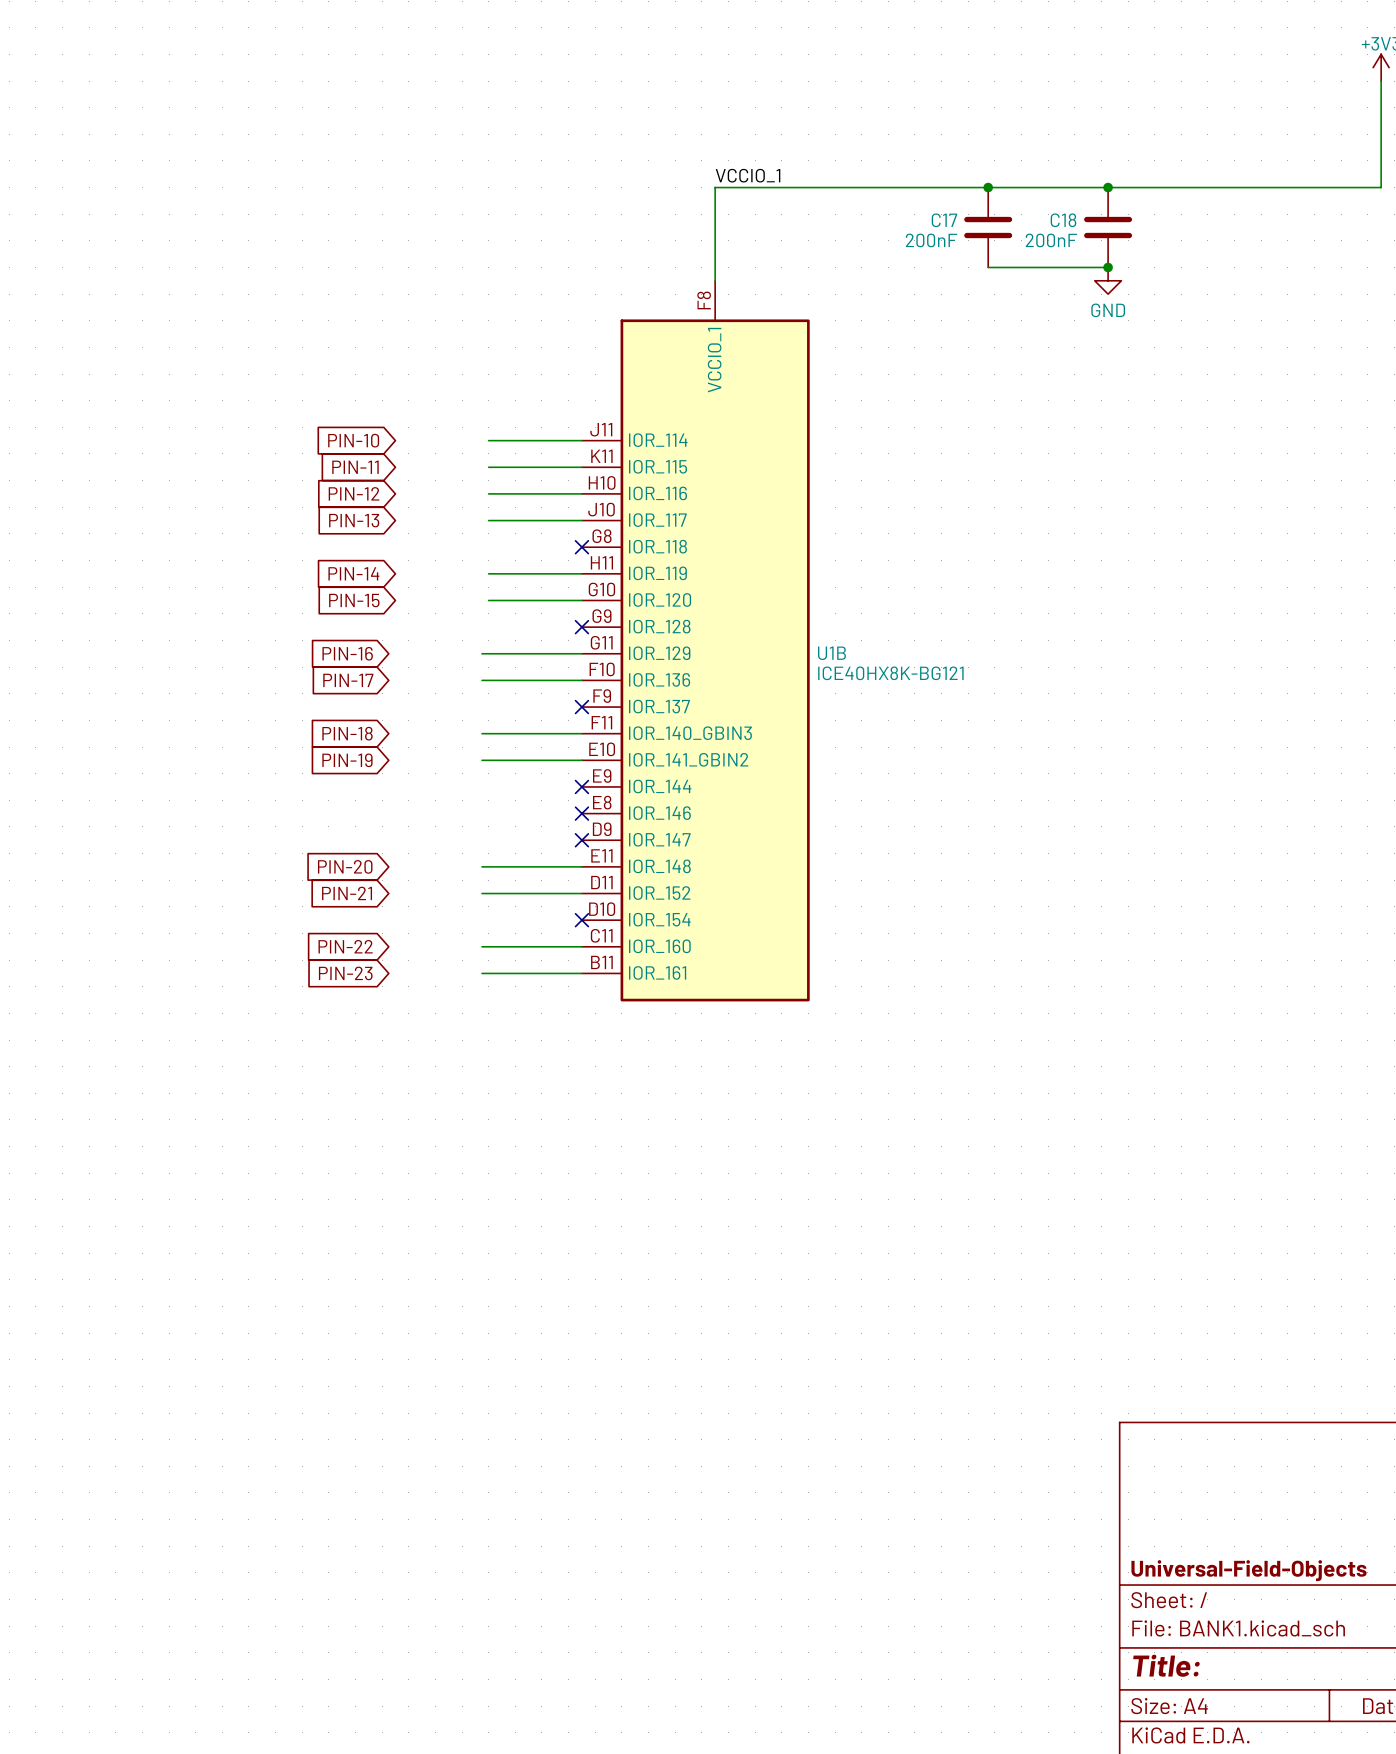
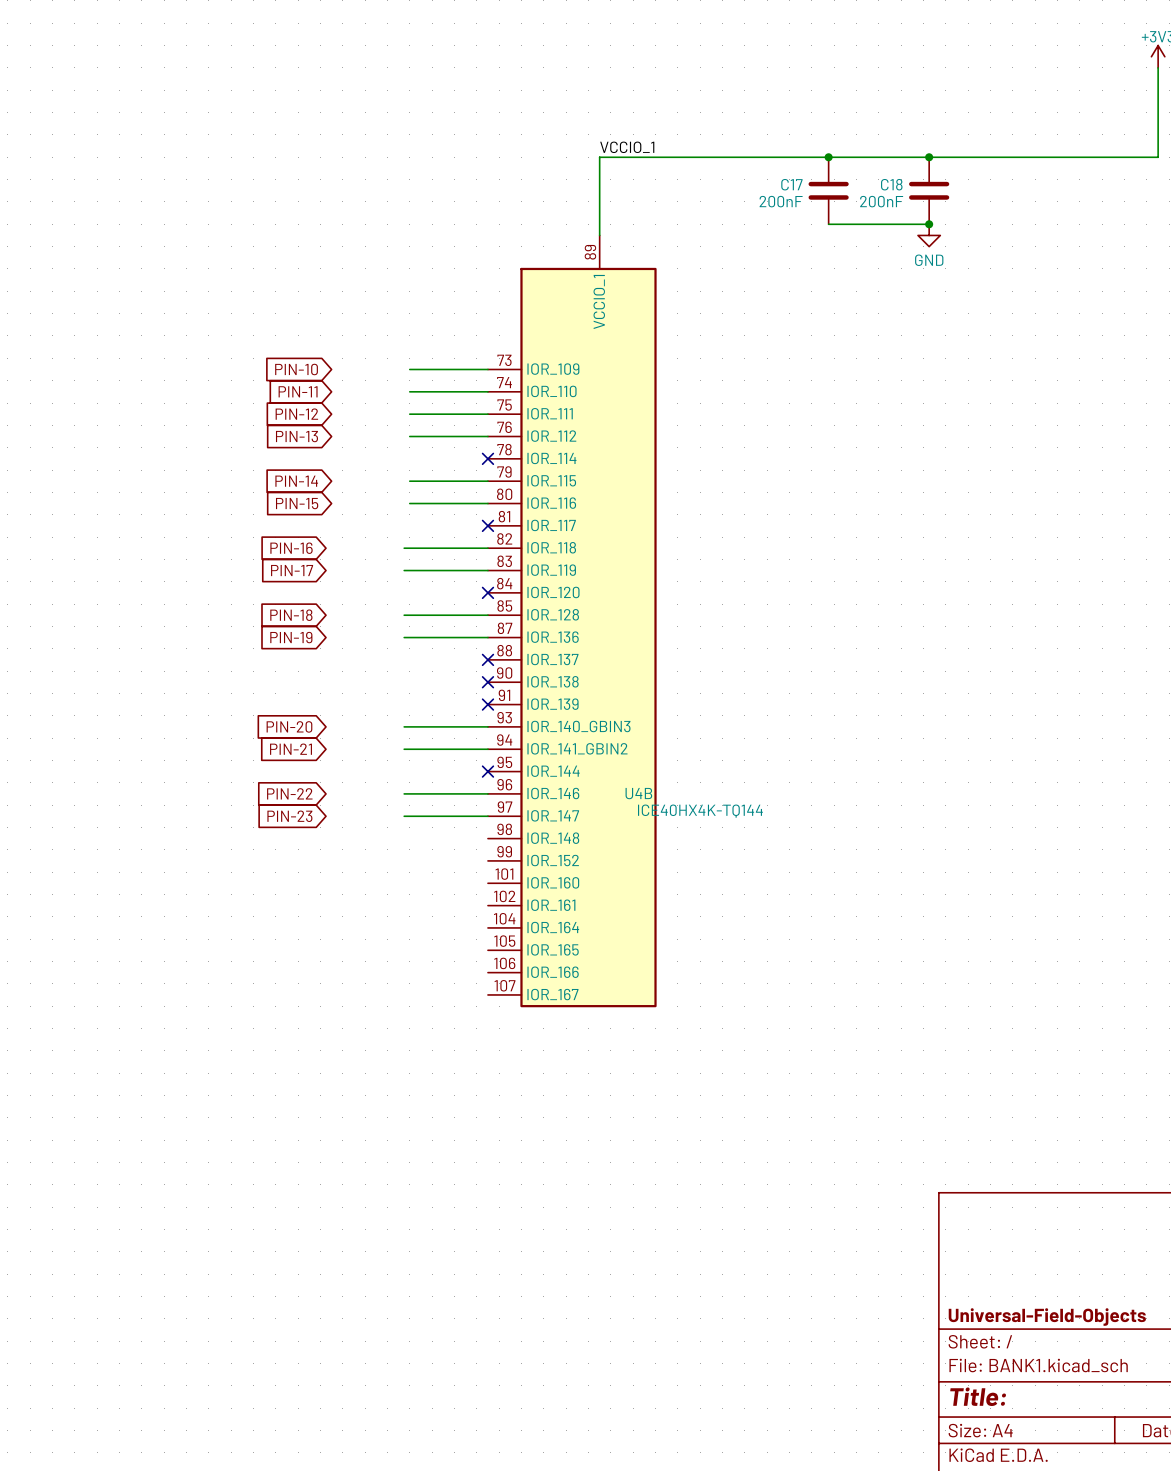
U1B: ICE40HX8K-BG121 (695, 641) -> none
U4B: none -> ICE40HX4K-TQ144 (572, 621)

